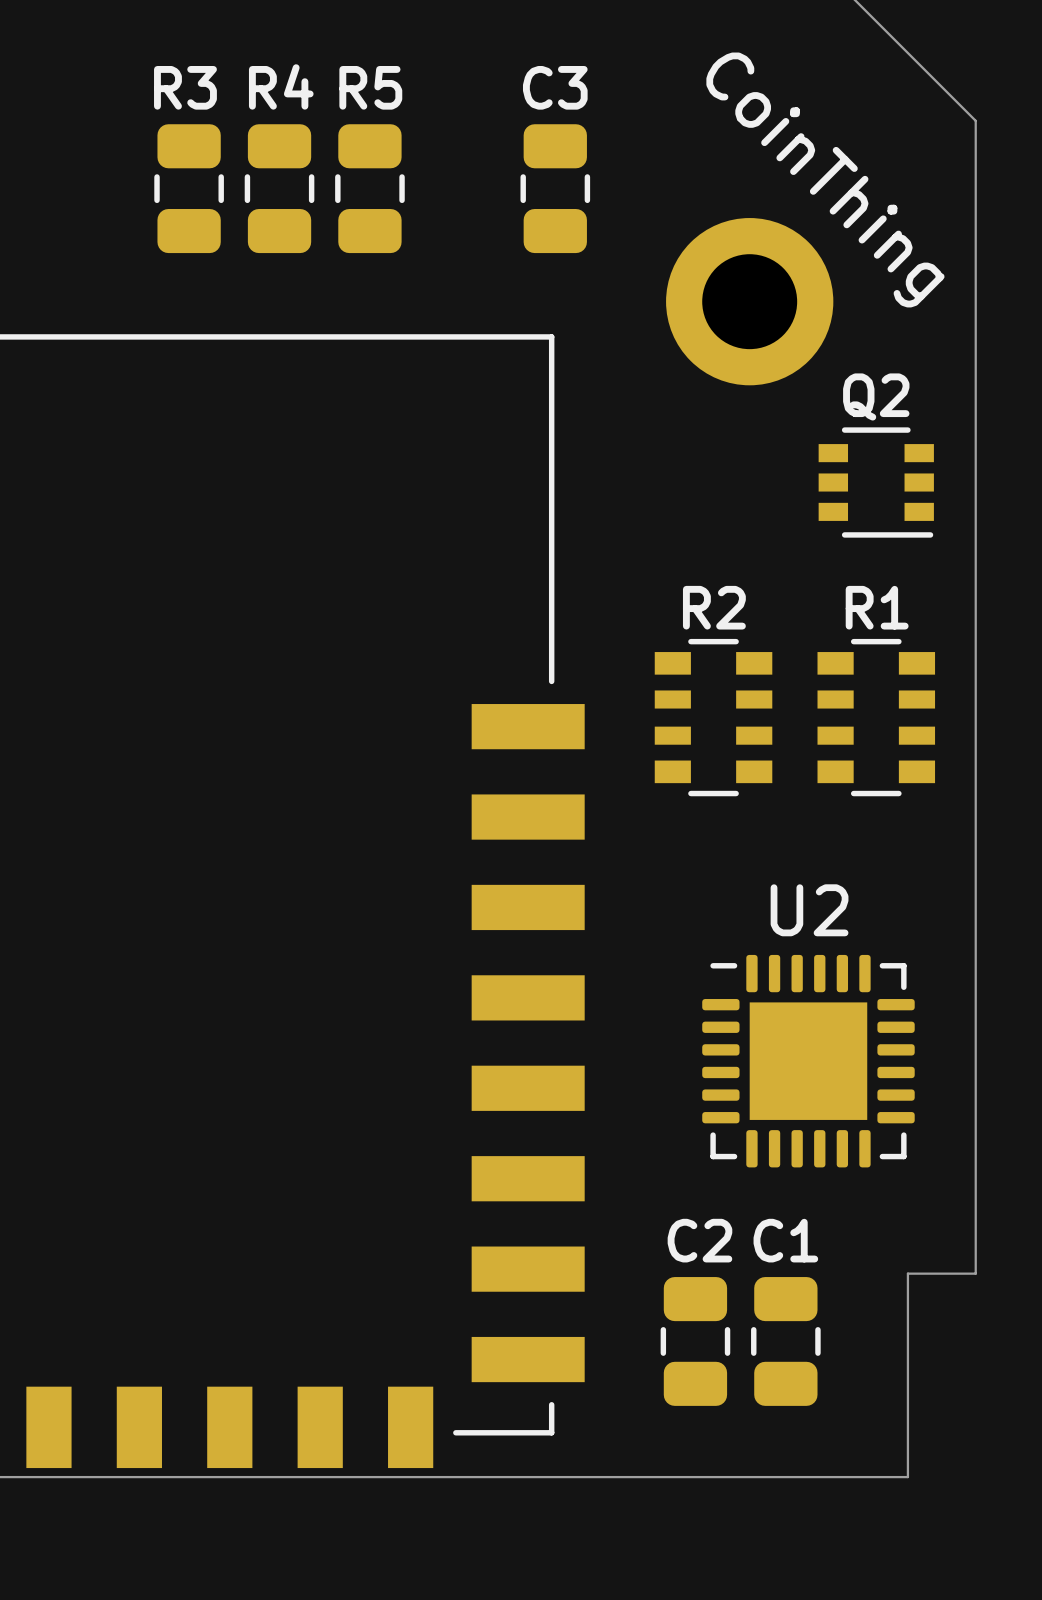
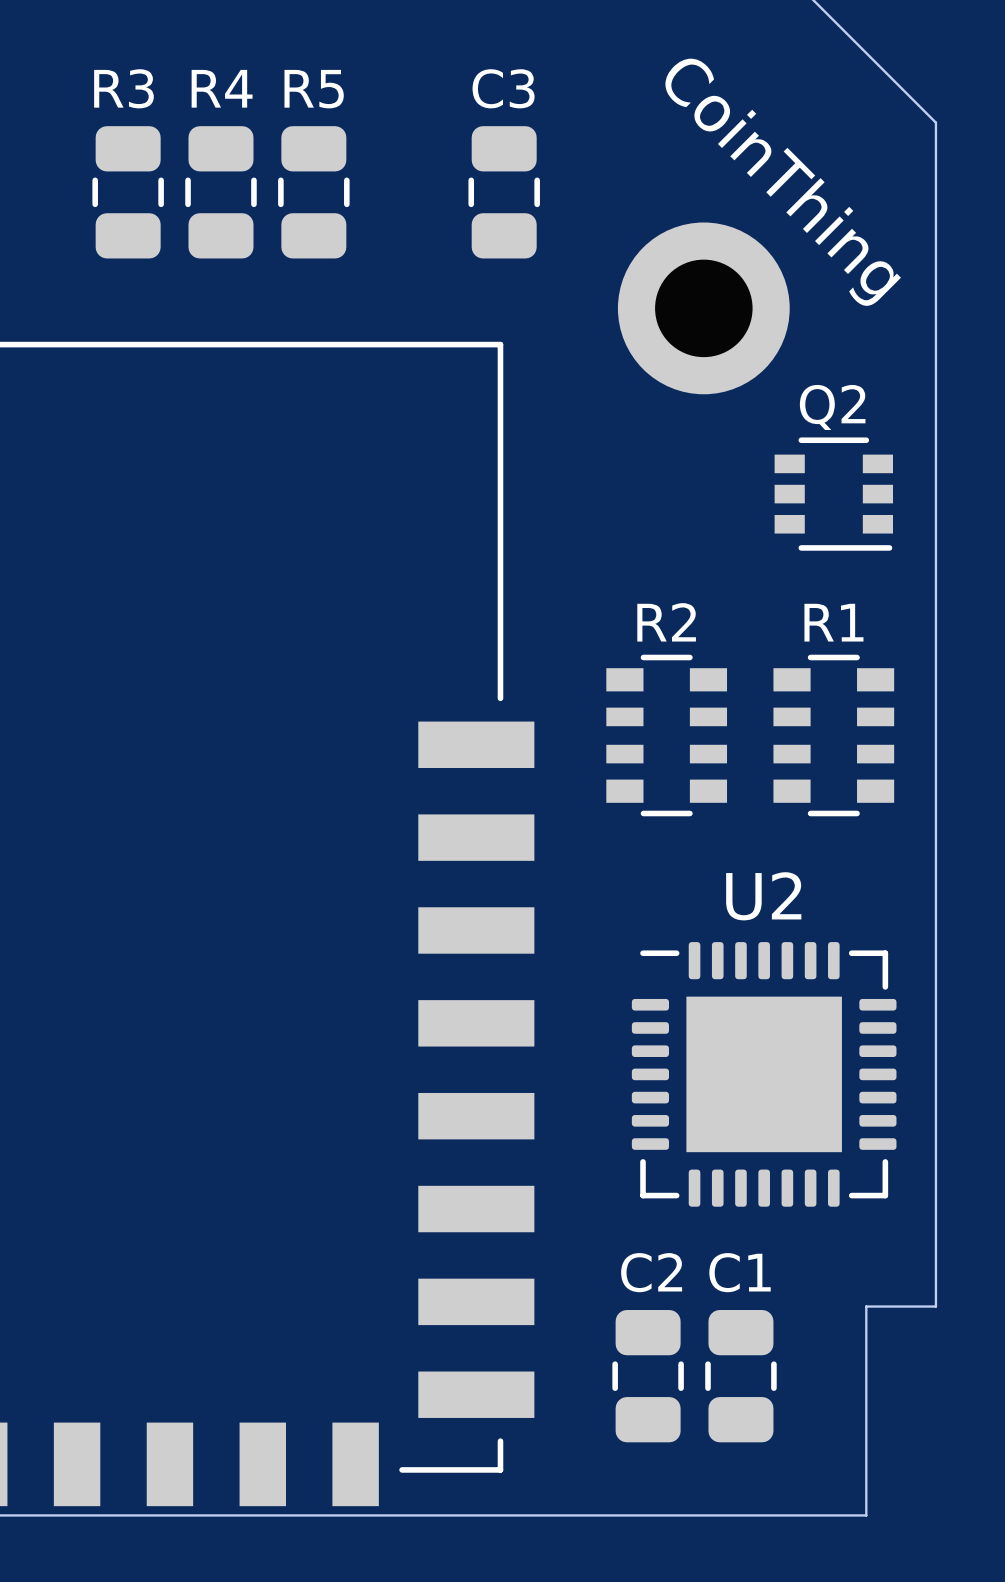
U2 name position: U2 (809, 910) -> U2 (763, 896)
U2 footprint: [702, 954, 915, 1168] -> [631, 942, 897, 1207]

